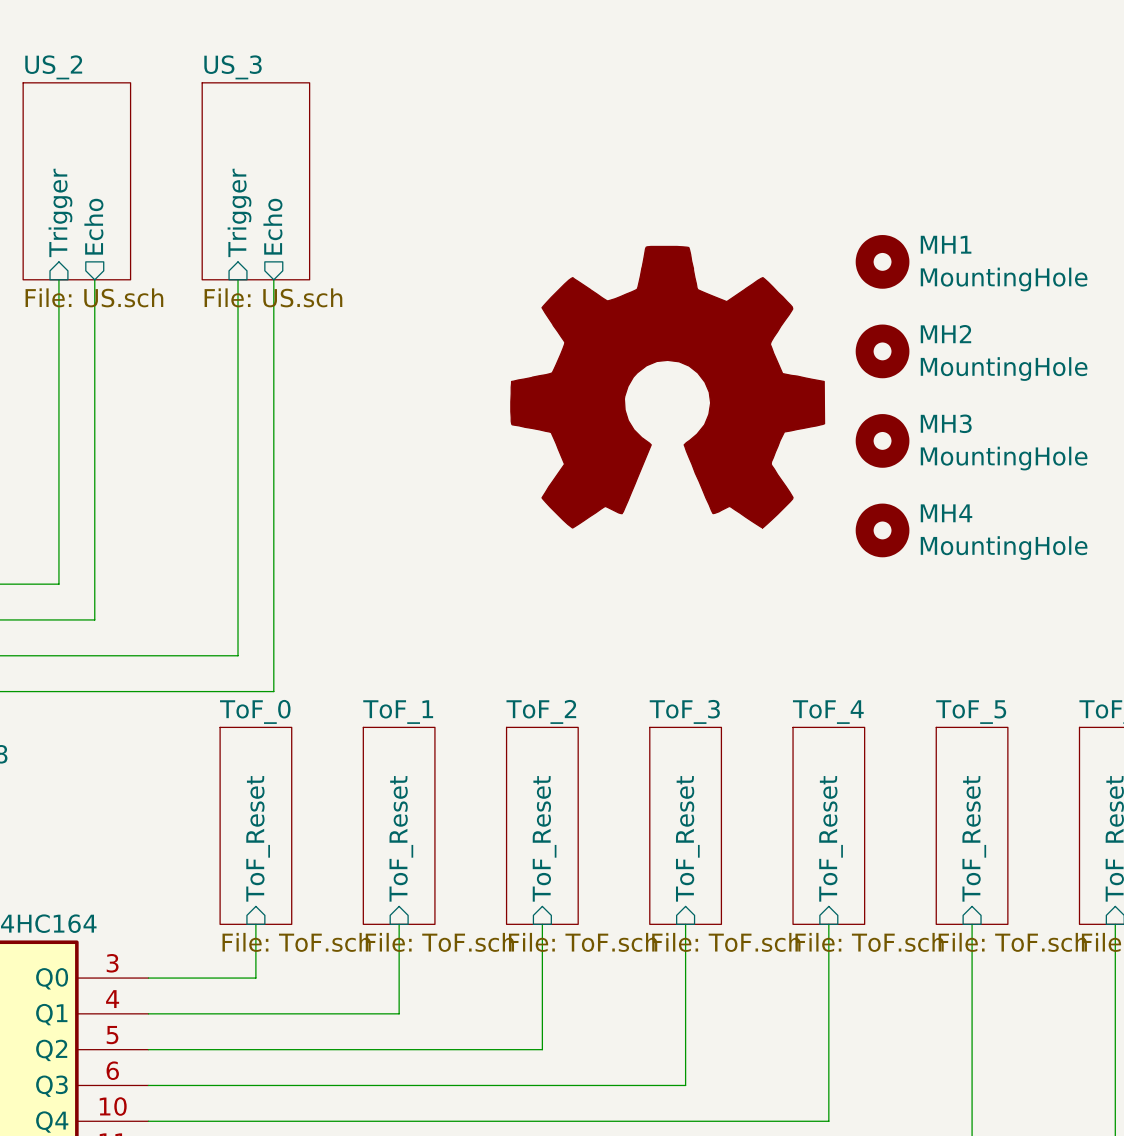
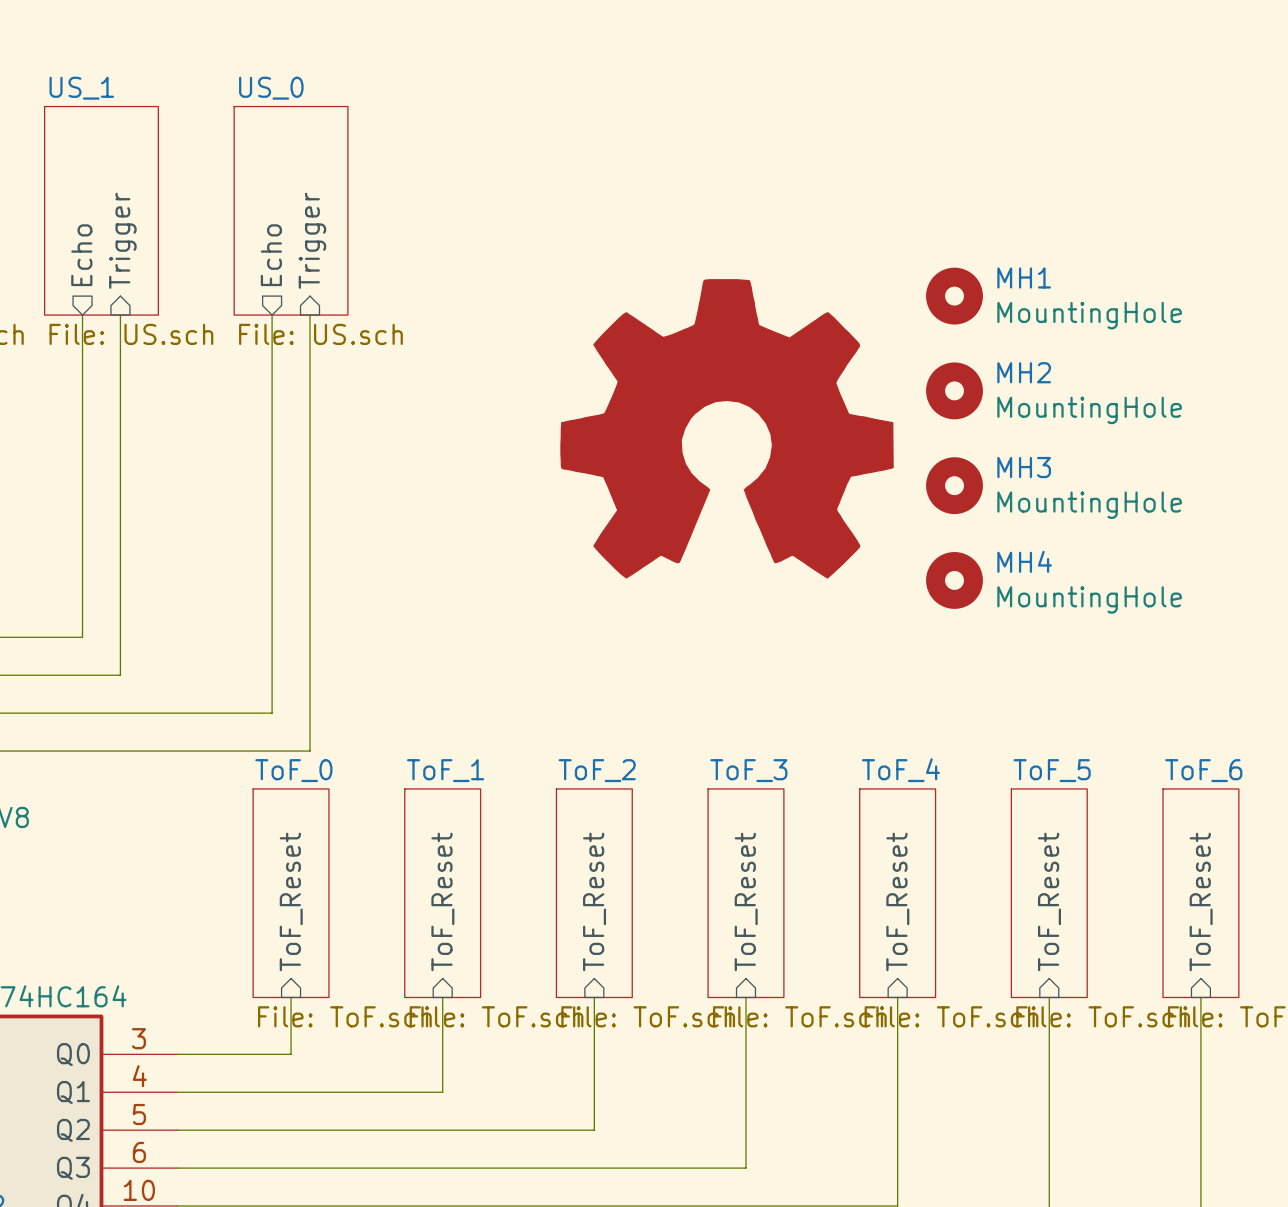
sheet US_2 name: US_2 (53, 67) -> US_1 (81, 88)
sheet US_3 name: US_3 (233, 67) -> US_0 (271, 88)
sheet pin shape: input (60, 212) -> output (81, 255)
sheet pin: Trigger (60, 212) -> Echo (81, 255)
sheet pin shape: input (239, 212) -> output (271, 255)
sheet pin: Trigger (239, 212) -> Echo (271, 255)
sheet pin shape: output (93, 226) -> input (122, 240)
sheet pin: Echo (93, 226) -> Trigger (122, 240)
sheet pin shape: output (272, 226) -> input (312, 240)
sheet pin: Echo (272, 226) -> Trigger (312, 240)

